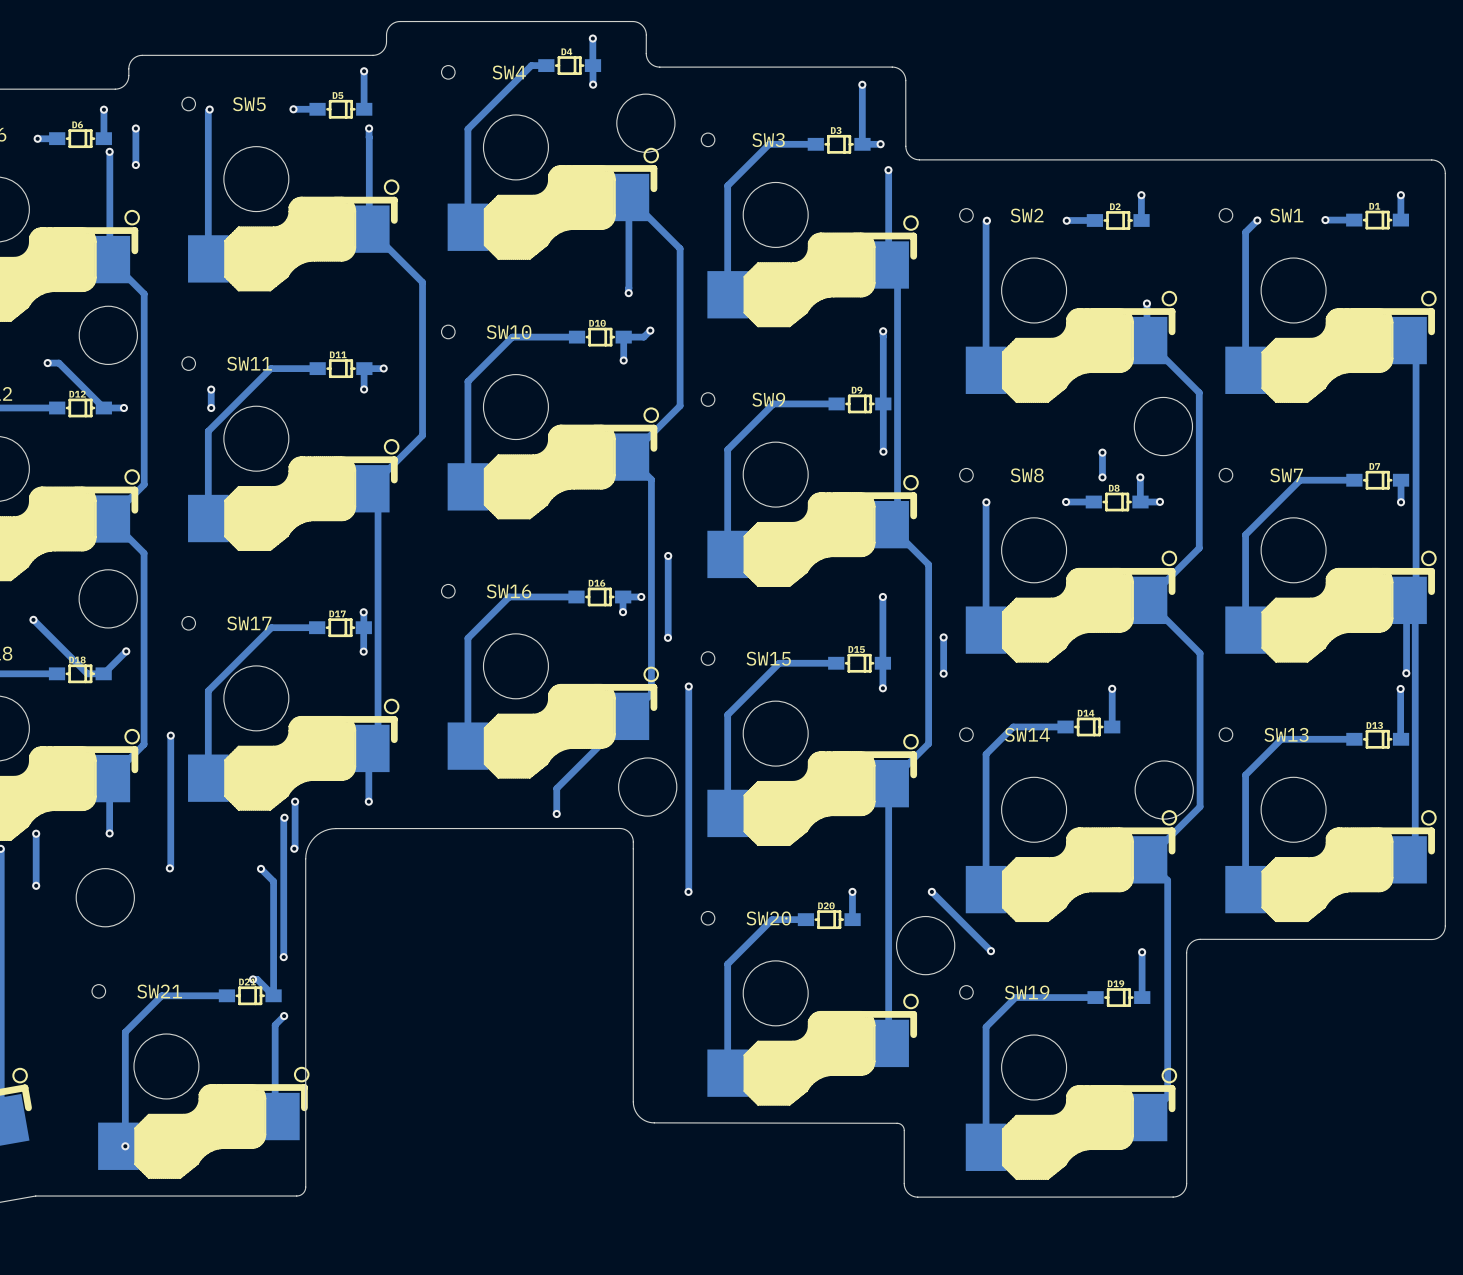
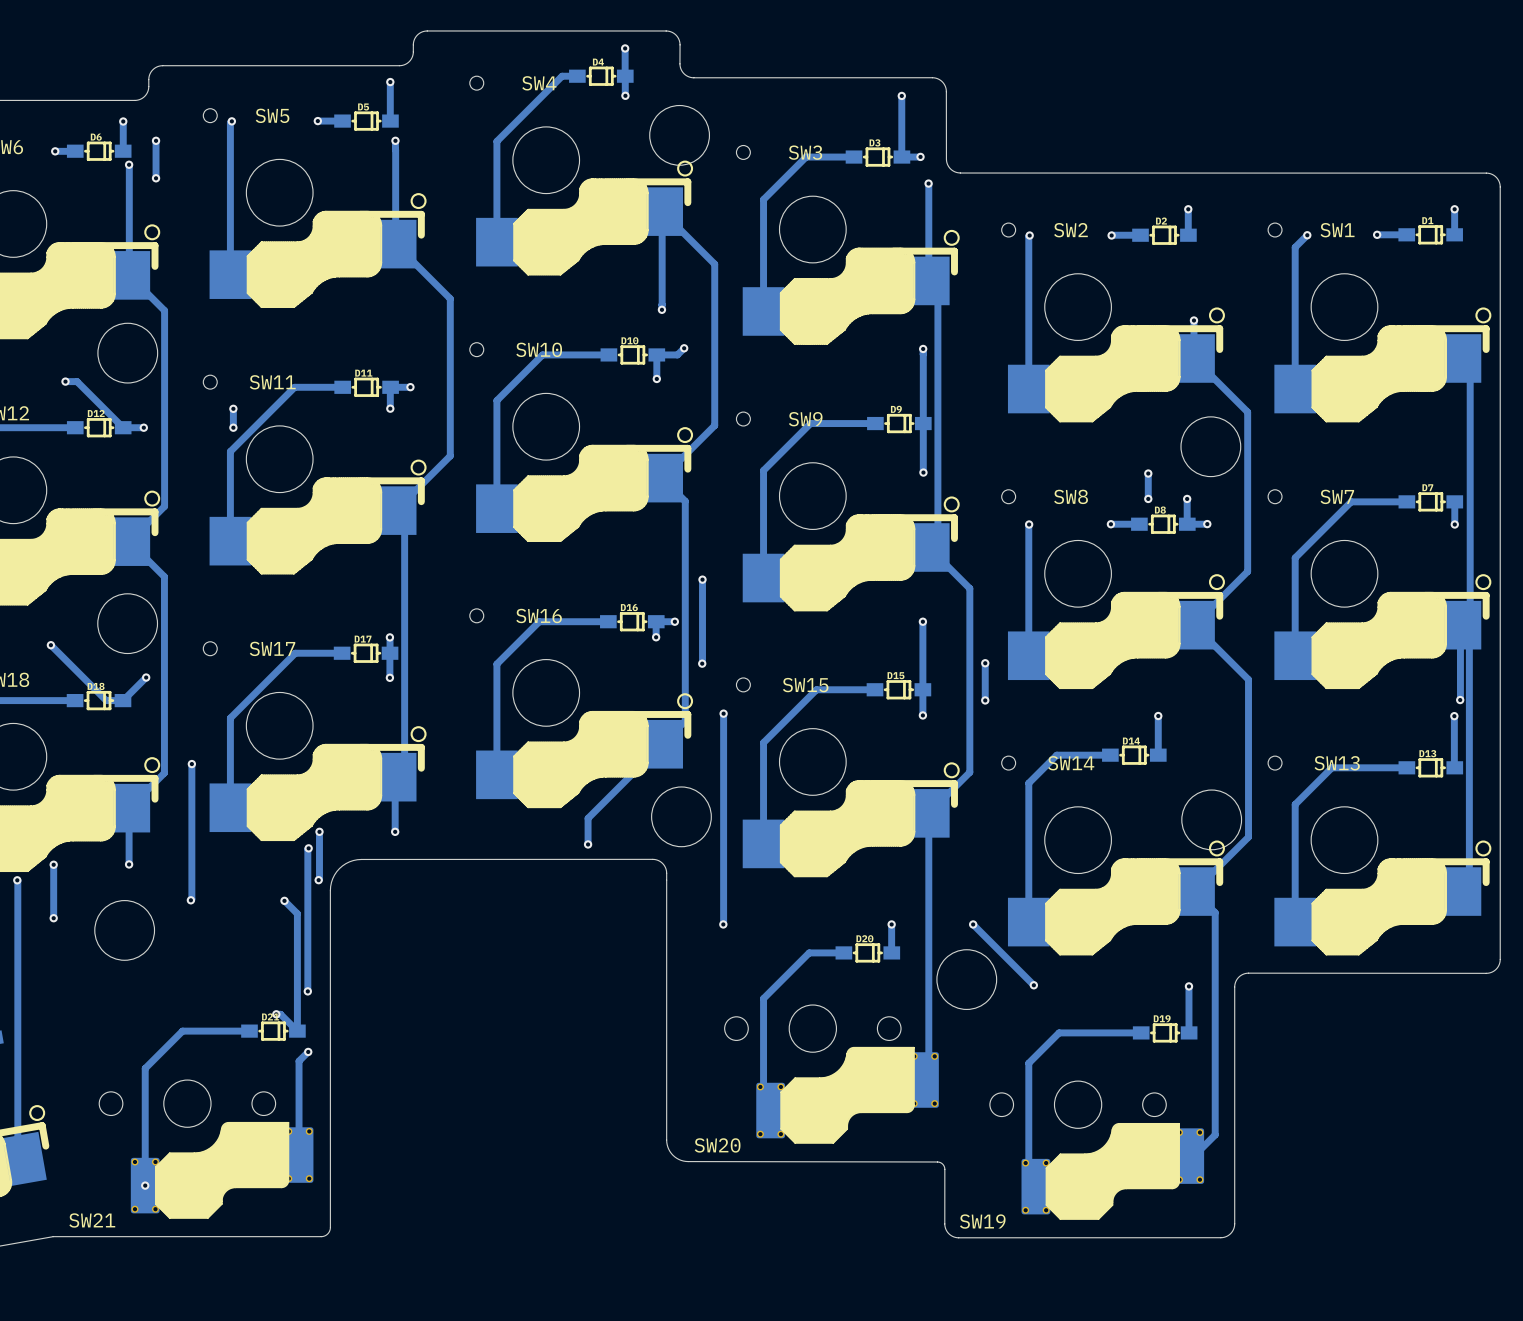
SW20 footprint: [701, 911, 919, 1106] -> [724, 1005, 939, 1144]
SW20 name position: SW20 (768, 918) -> SW20 (717, 1145)
SW21 footprint: [92, 984, 310, 1179] -> [99, 1080, 314, 1219]
SW19 footprint: [959, 985, 1178, 1180] -> [989, 1081, 1205, 1220]
SW21 name position: SW21 (159, 991) -> SW21 (92, 1220)
SW19 name position: SW19 (1027, 992) -> SW19 (982, 1221)

